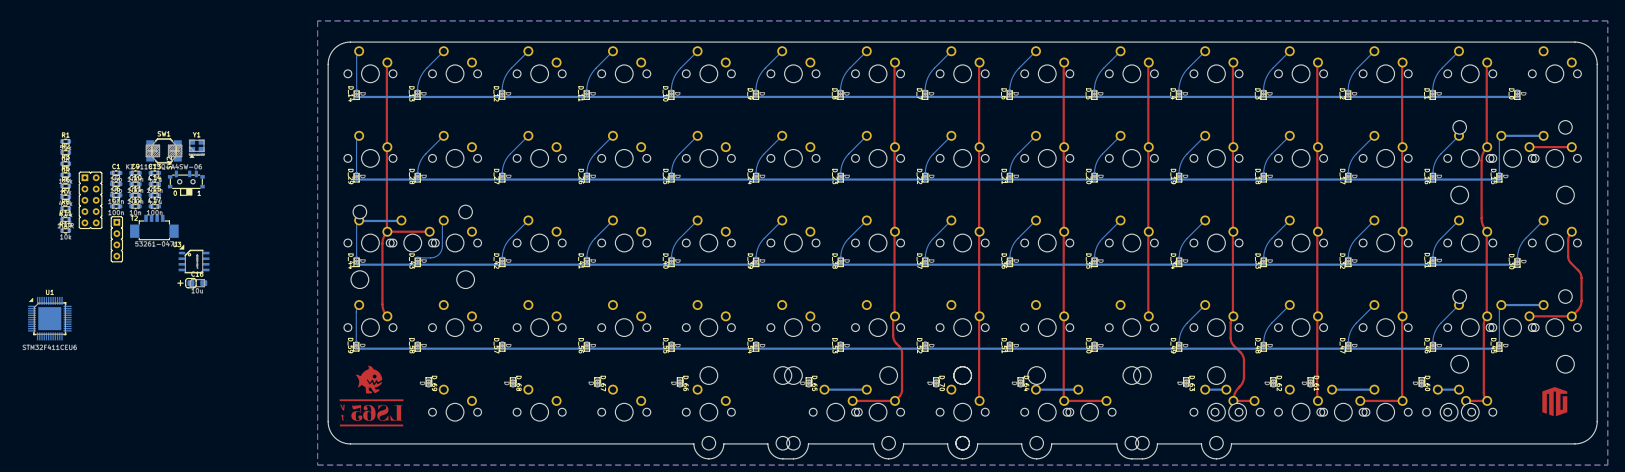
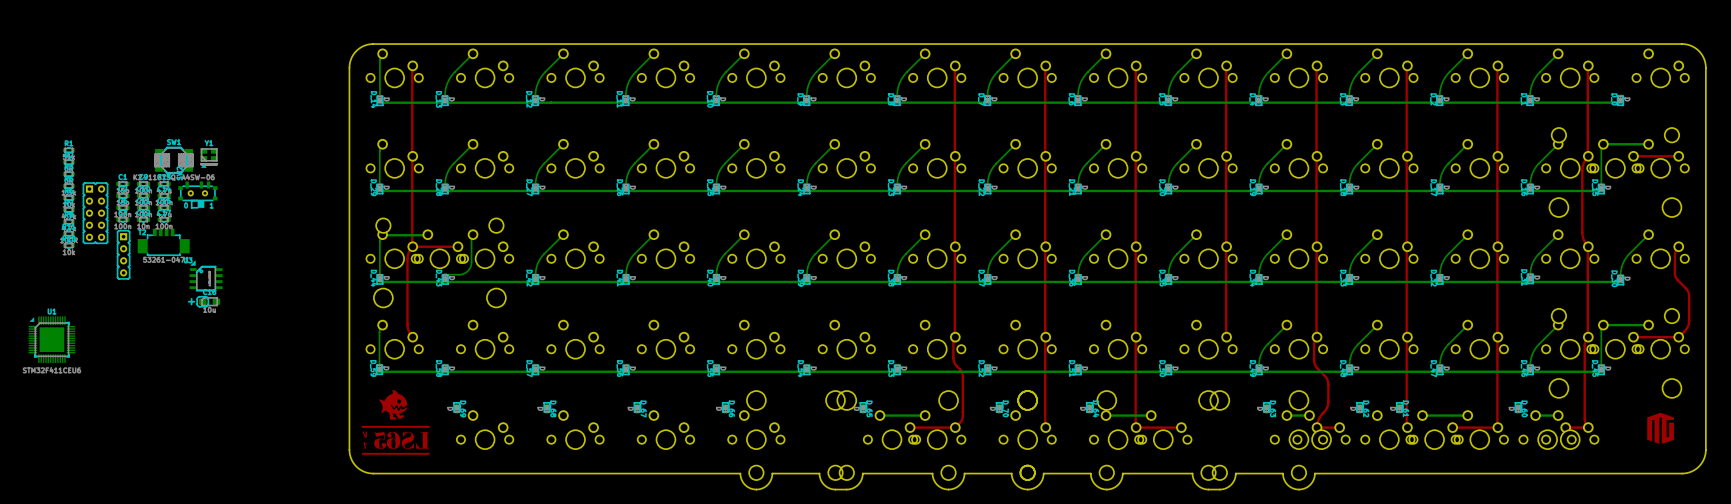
bottom zone outline: (1607, 20) (317, 20) (317, 465) (1607, 465) (1607, 20) -> none
top zone outline: (1607, 20) (317, 20) (317, 465) (1607, 465) (1607, 20) -> none

